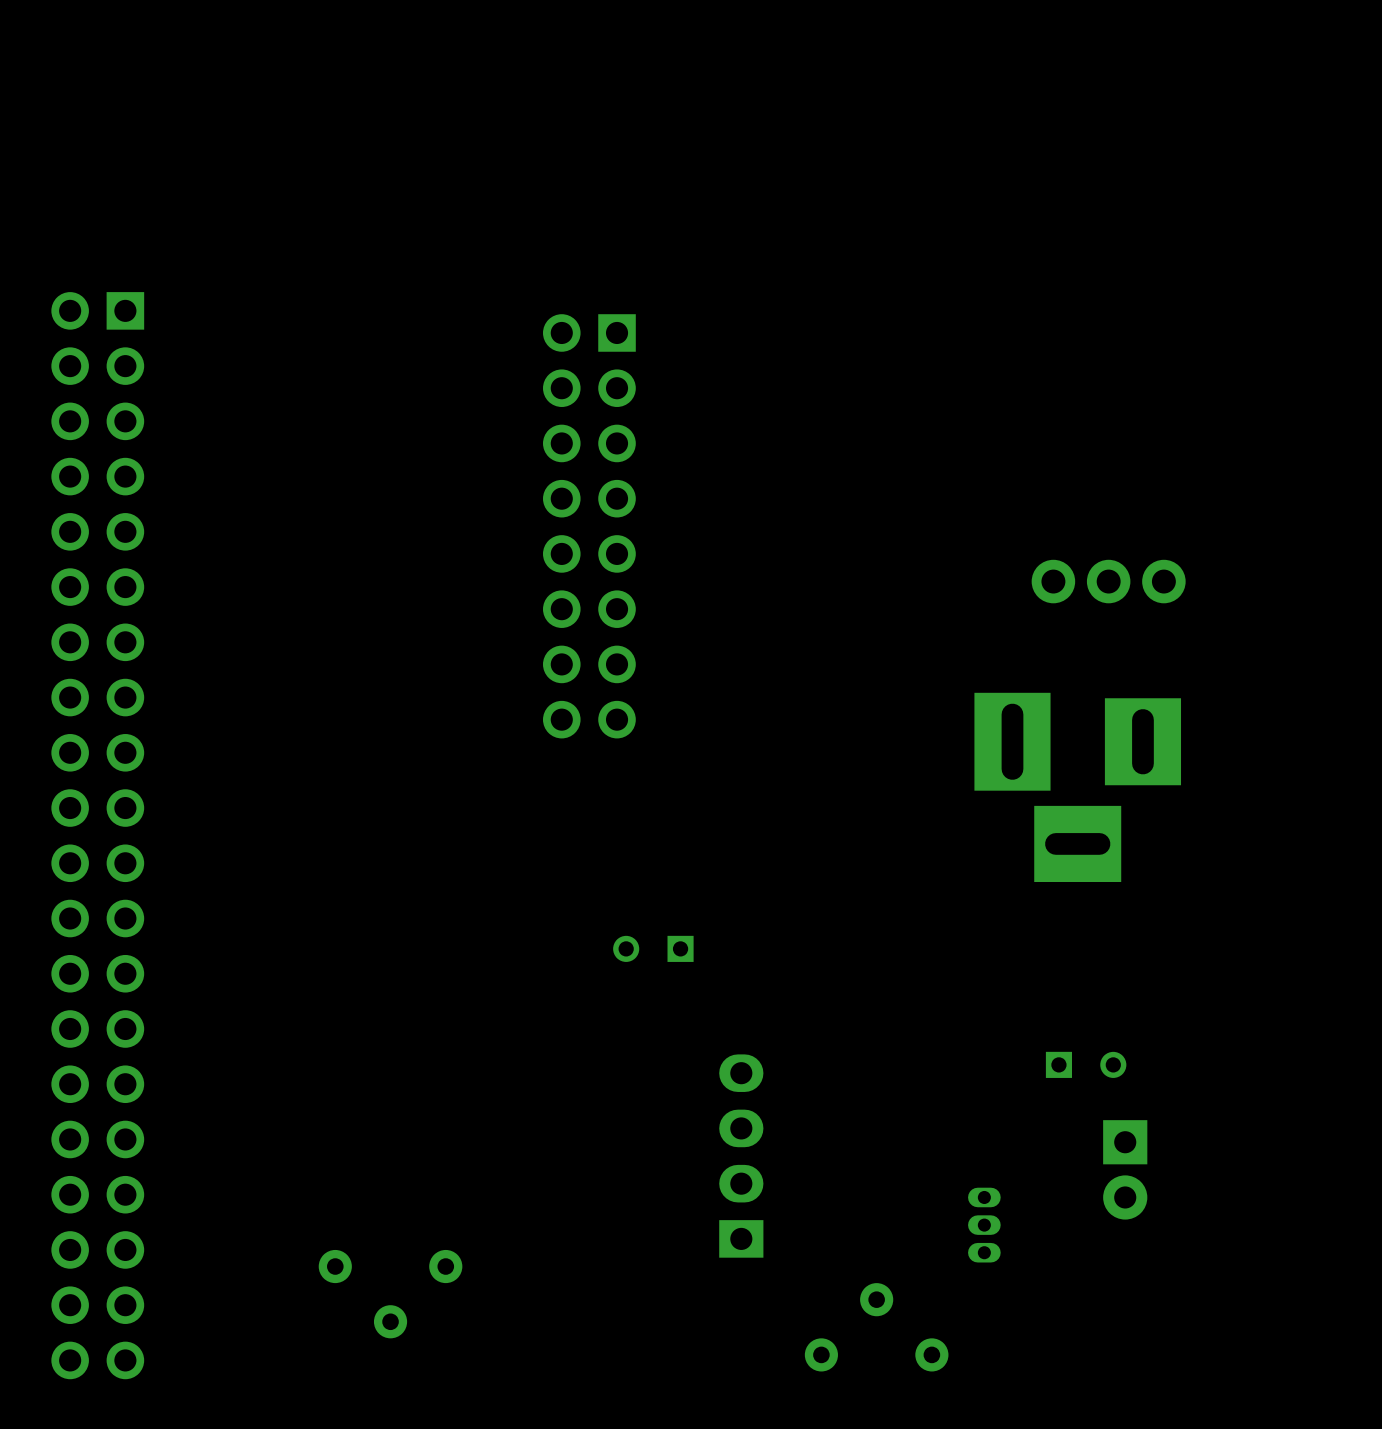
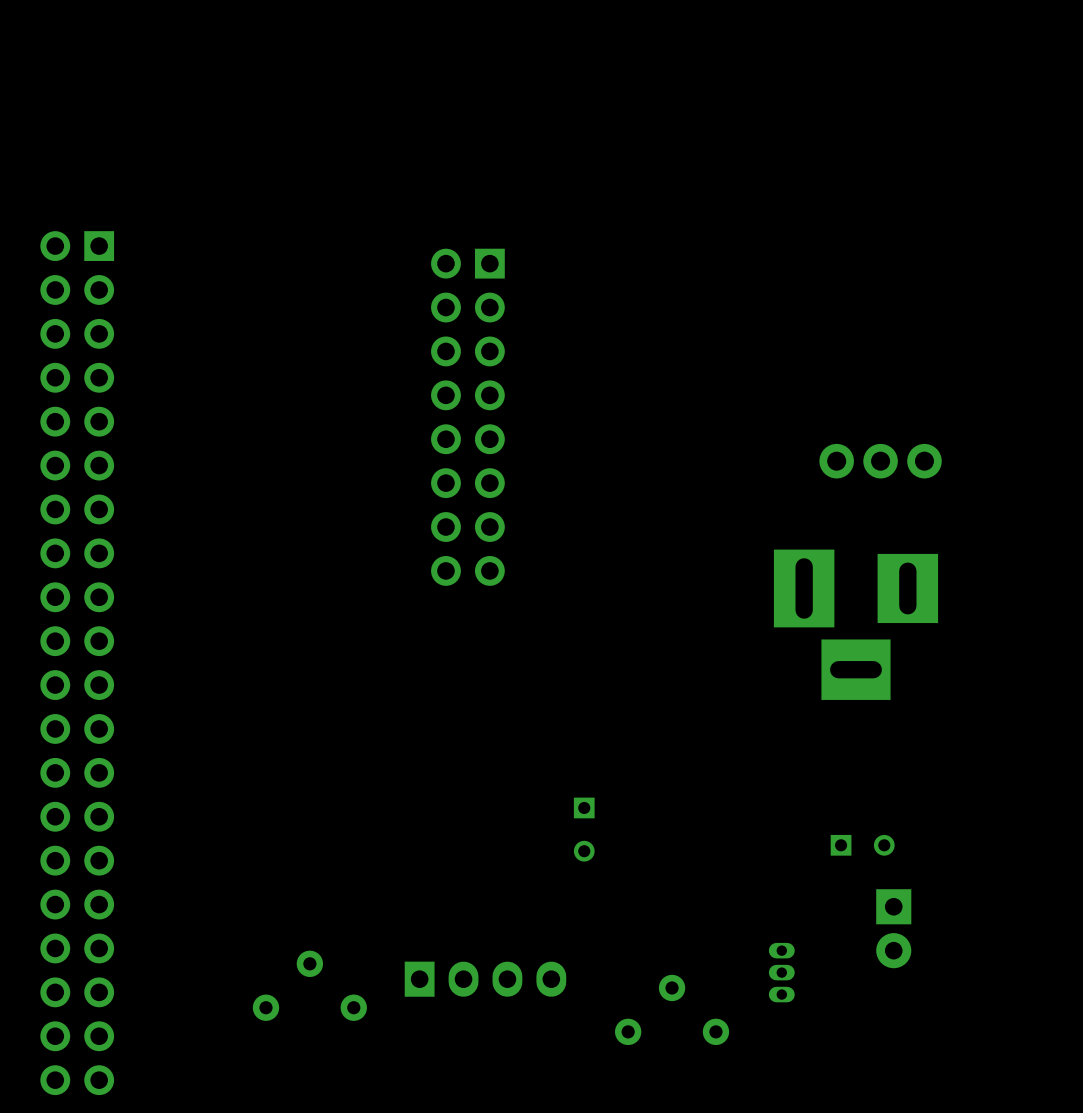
part rotation: 0° (653, 948) -> 90° counterclockwise (584, 829)
part position: (653, 948) -> (584, 829)
part rotation: 0° (741, 1156) -> 90° clockwise (485, 979)
part position: (741, 1156) -> (485, 979)
part rotation: 0° (390, 1294) -> 180° (309, 985)
part position: (876, 1327) -> (672, 1009)

